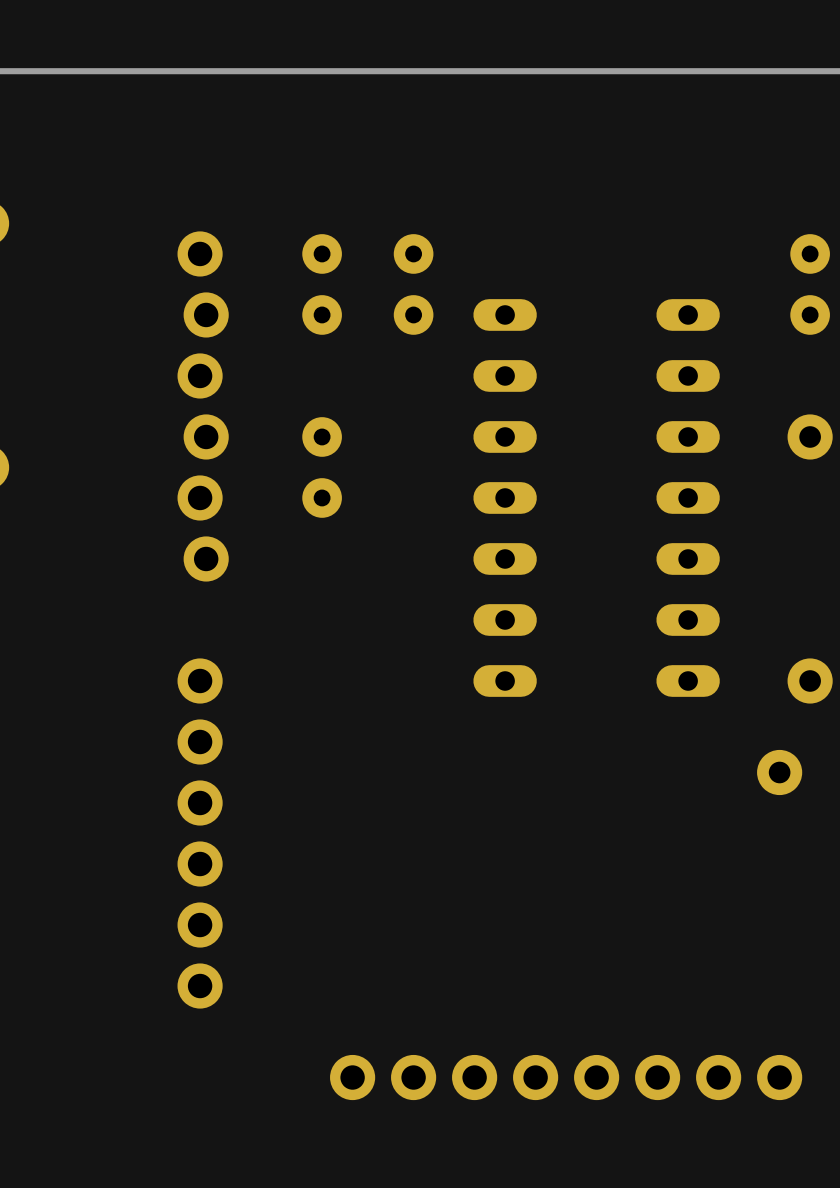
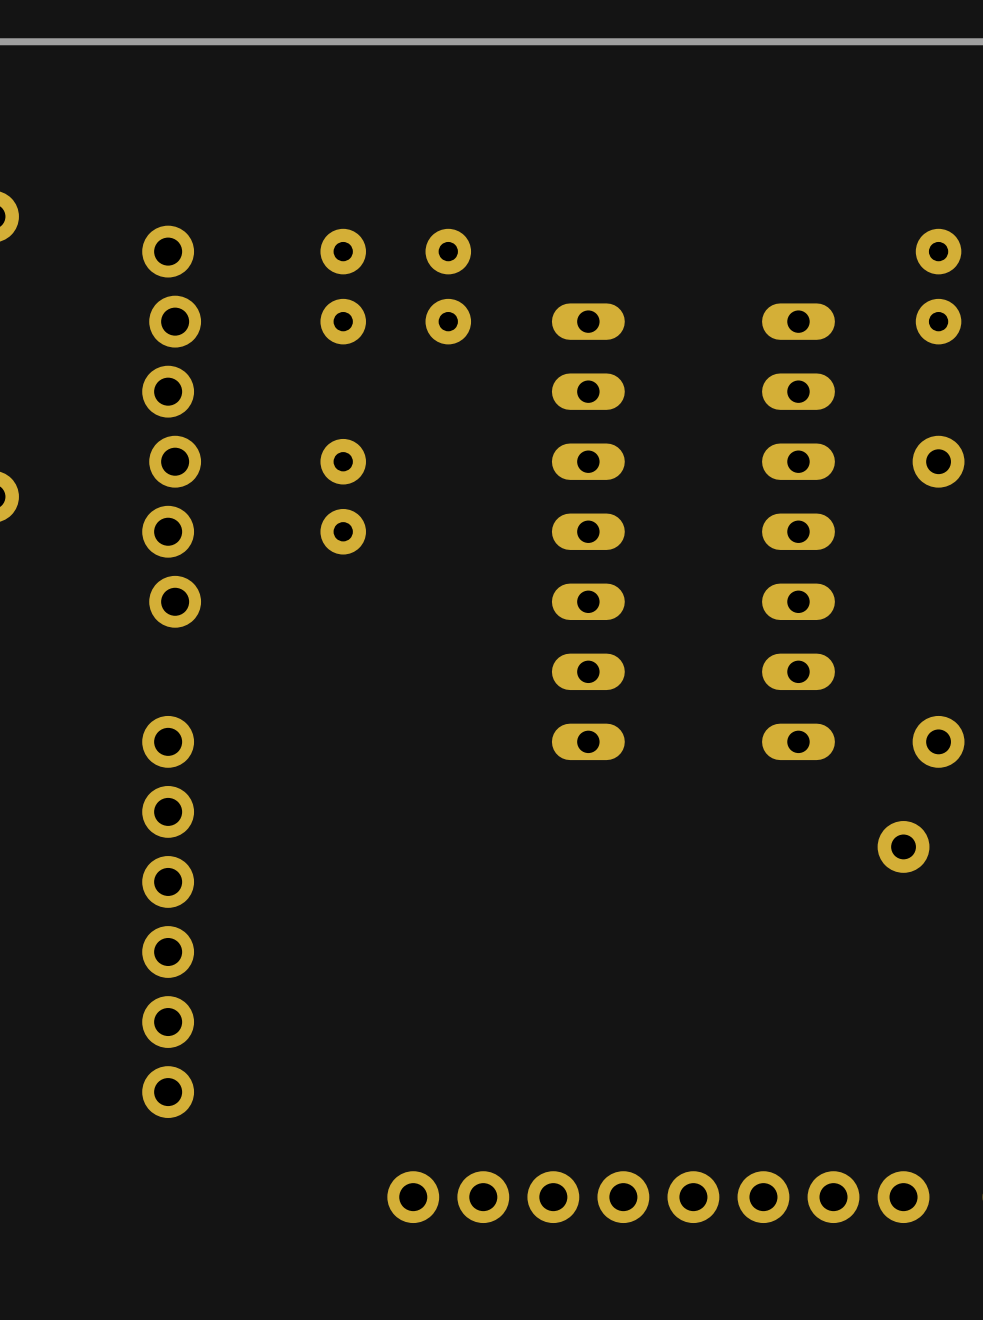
part: none -> (343, 286)
part: (322, 284) -> none
part: none -> (448, 286)
part: (413, 284) -> none
part position: (203, 406) -> (171, 426)
part position: (322, 467) -> (343, 496)
part position: (200, 833) -> (168, 916)

